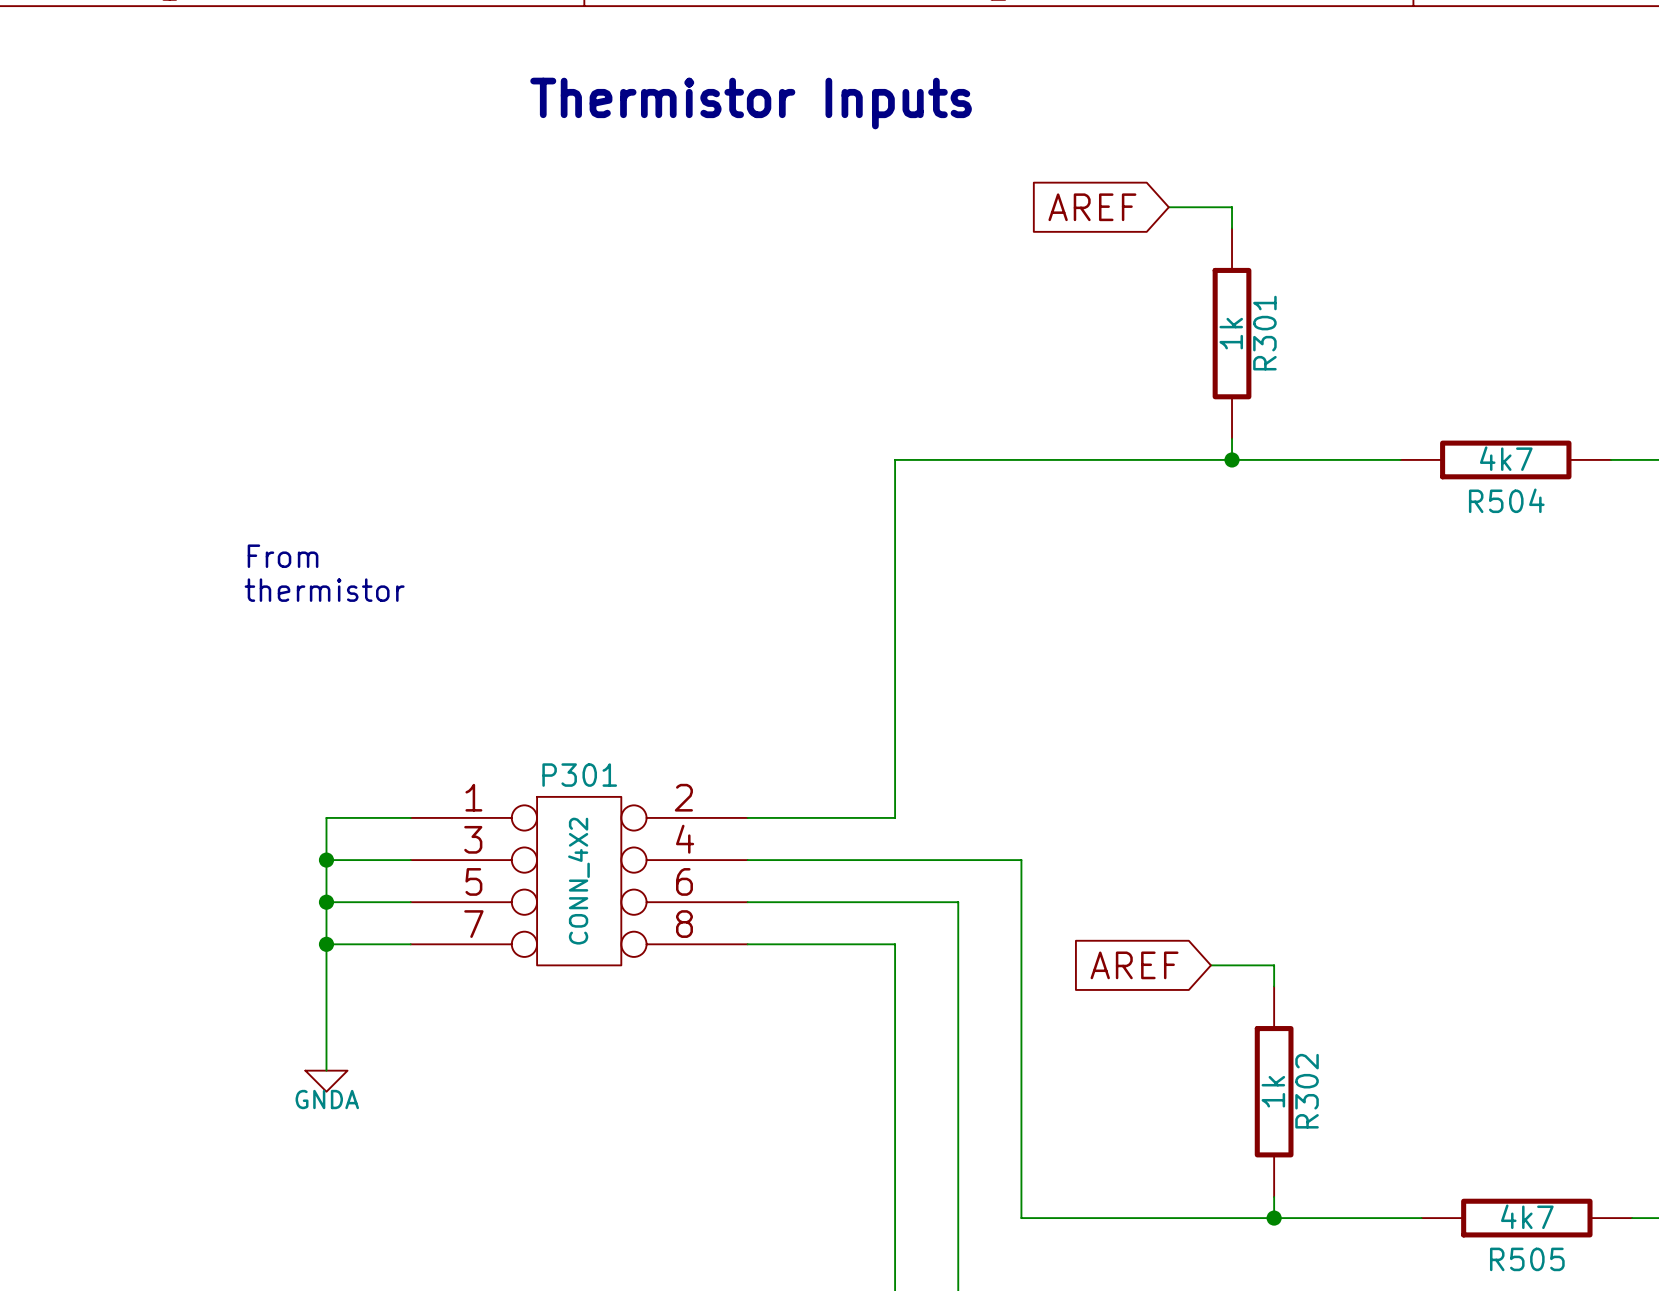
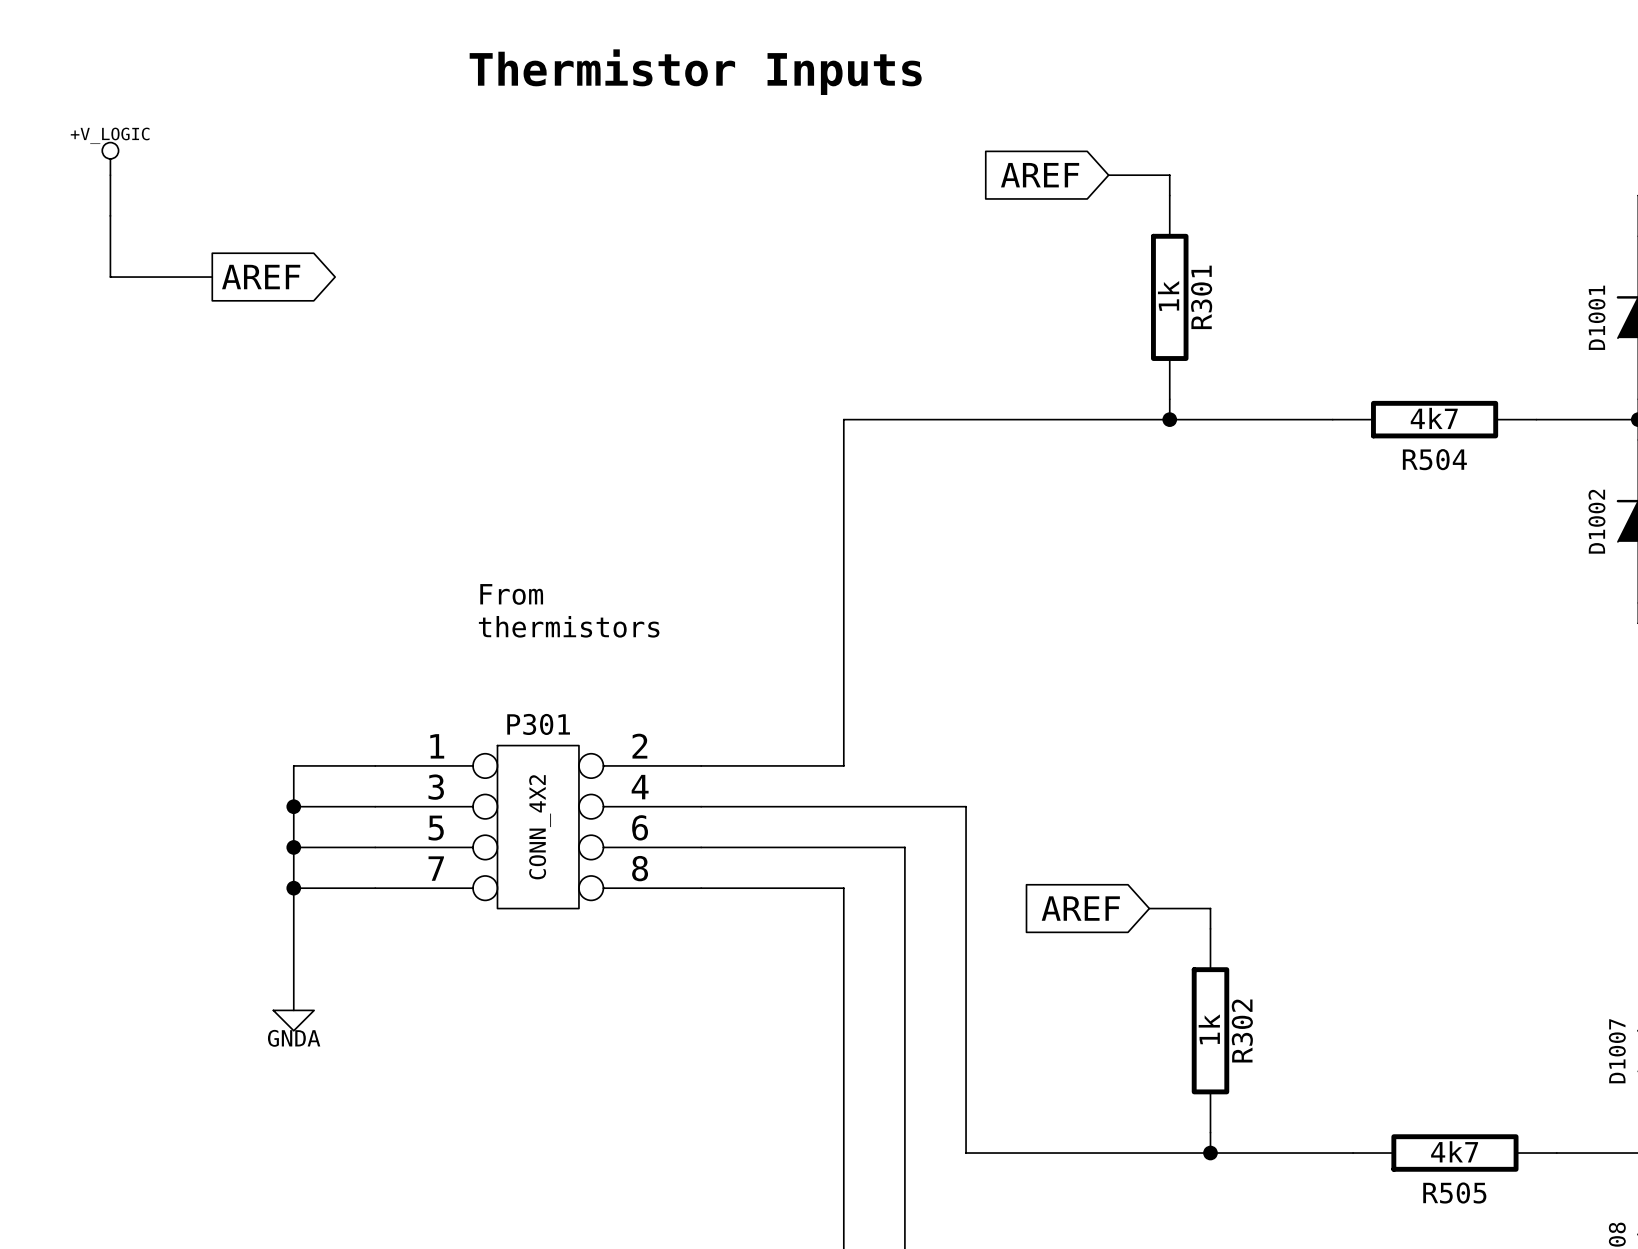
power symbol: none -> +V_LOGIC (110, 158)
wire: none -> (110, 175) (110, 277) (212, 277)
global label: none -> AREF (261, 277)
text position: From (283, 556) -> From (511, 594)
text: thermistor (324, 590) -> none
text: none -> thermistors (569, 626)

